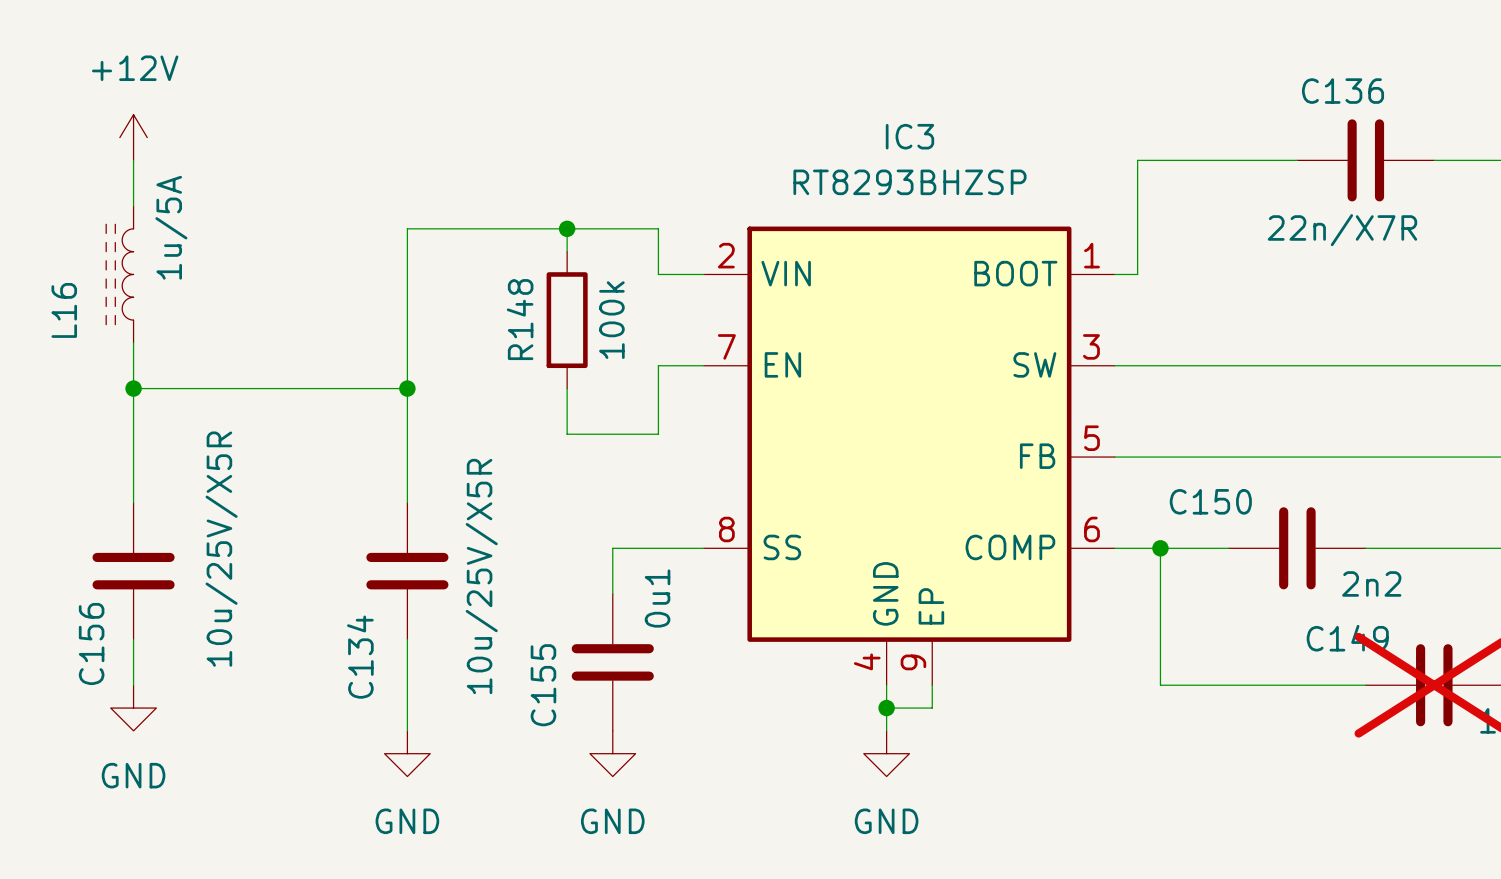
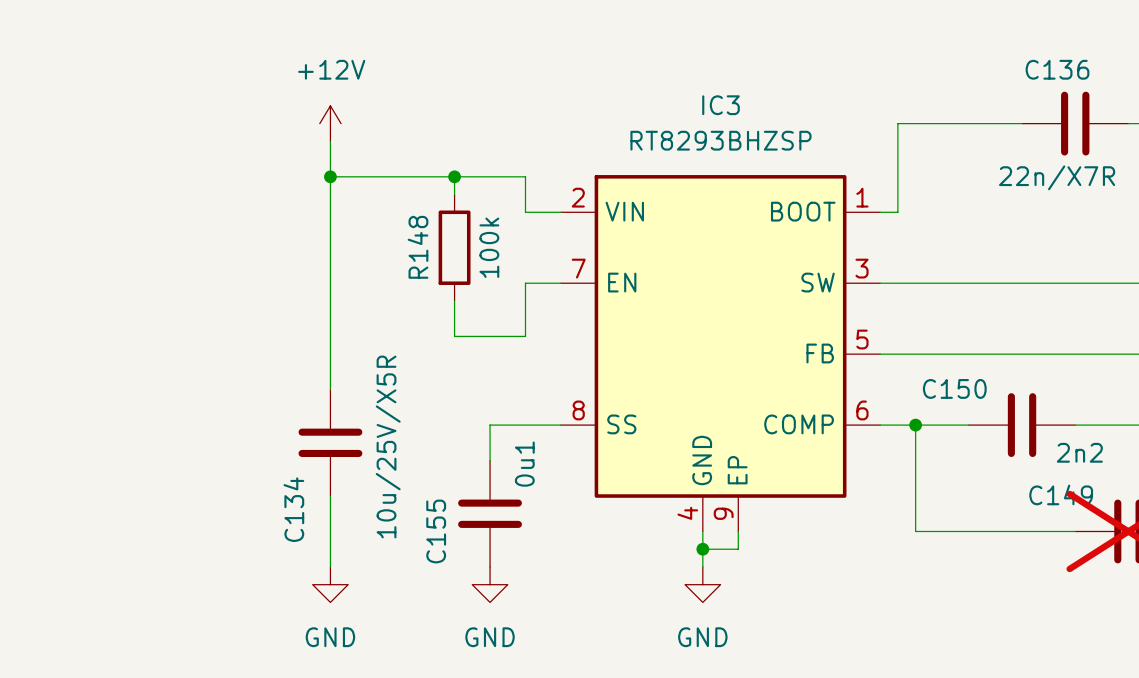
power symbol position: +12V (133, 137) -> +12V (330, 123)
wire: (133, 160) (133, 206) -> (330, 141) (330, 176)
junction: none -> (330, 176)
L16: 1u/5A (119, 274) -> none
wire: (133, 342) (133, 502) -> none
wire: (133, 388) (407, 388) -> none
junction: (133, 388) -> none
junction: (407, 388) -> none
C156: 10u/25V/X5R (133, 571) -> none
wire: (133, 639) (133, 685) -> none
power symbol: GND (133, 708) -> none

